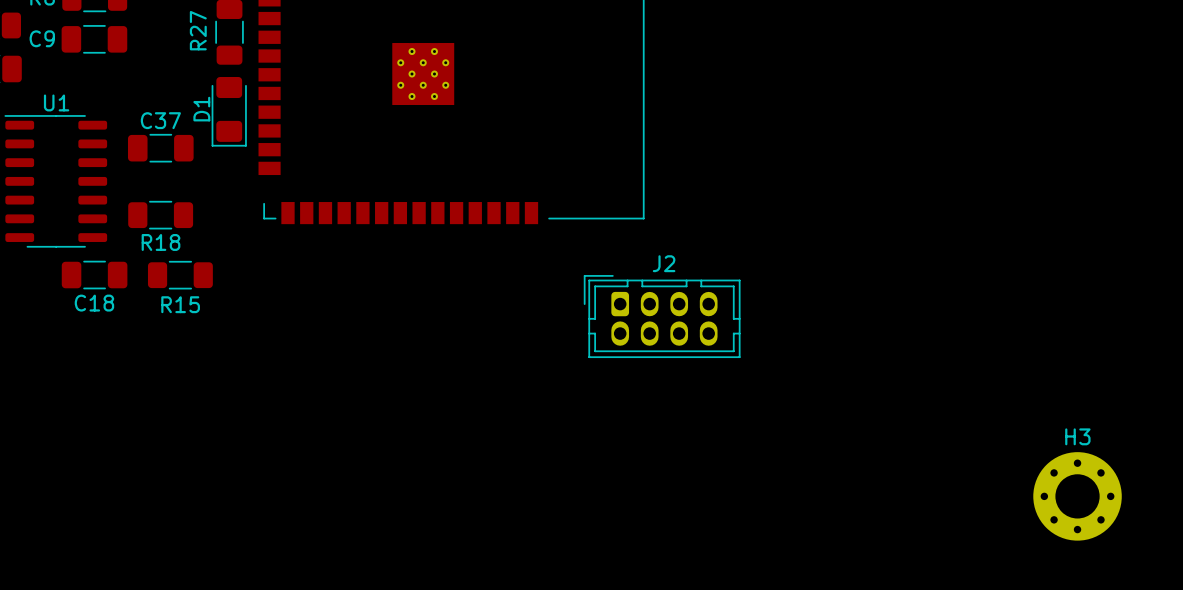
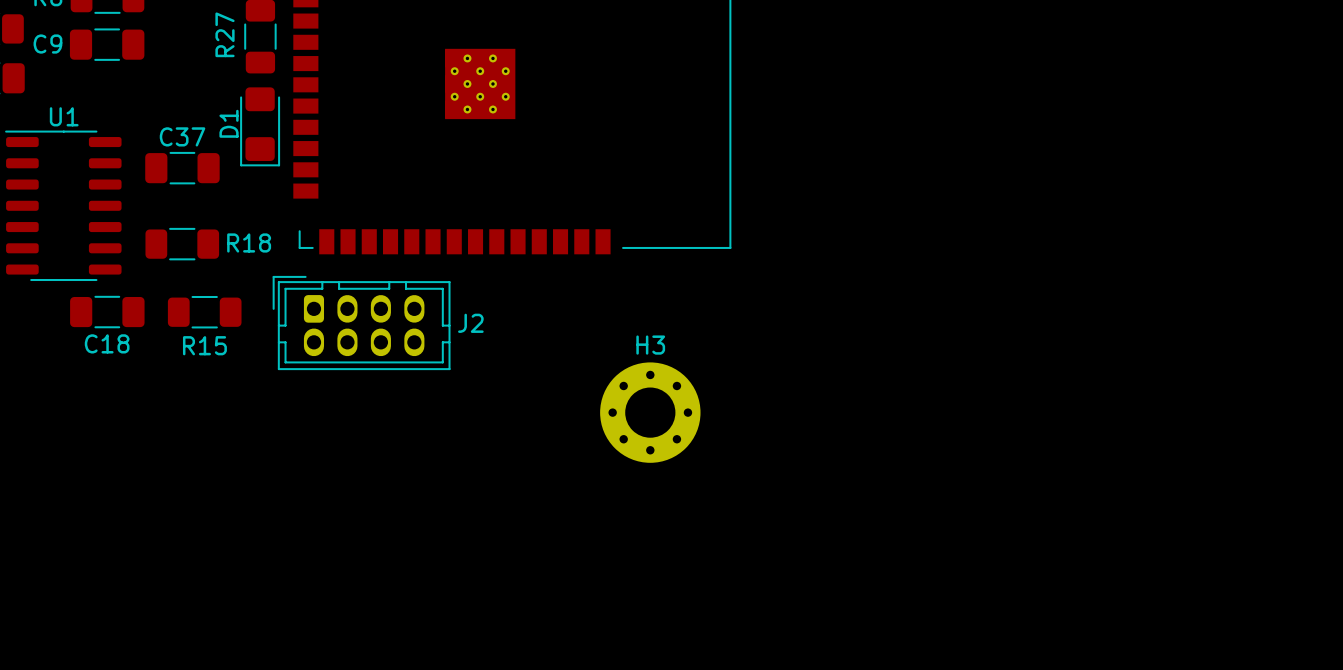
R18 name position: R18 (161, 242) -> R18 (249, 242)
J2 name position: J2 (664, 263) -> J2 (470, 323)
J2 position: (662, 316) -> (361, 323)
H3 position: (1077, 496) -> (650, 412)

